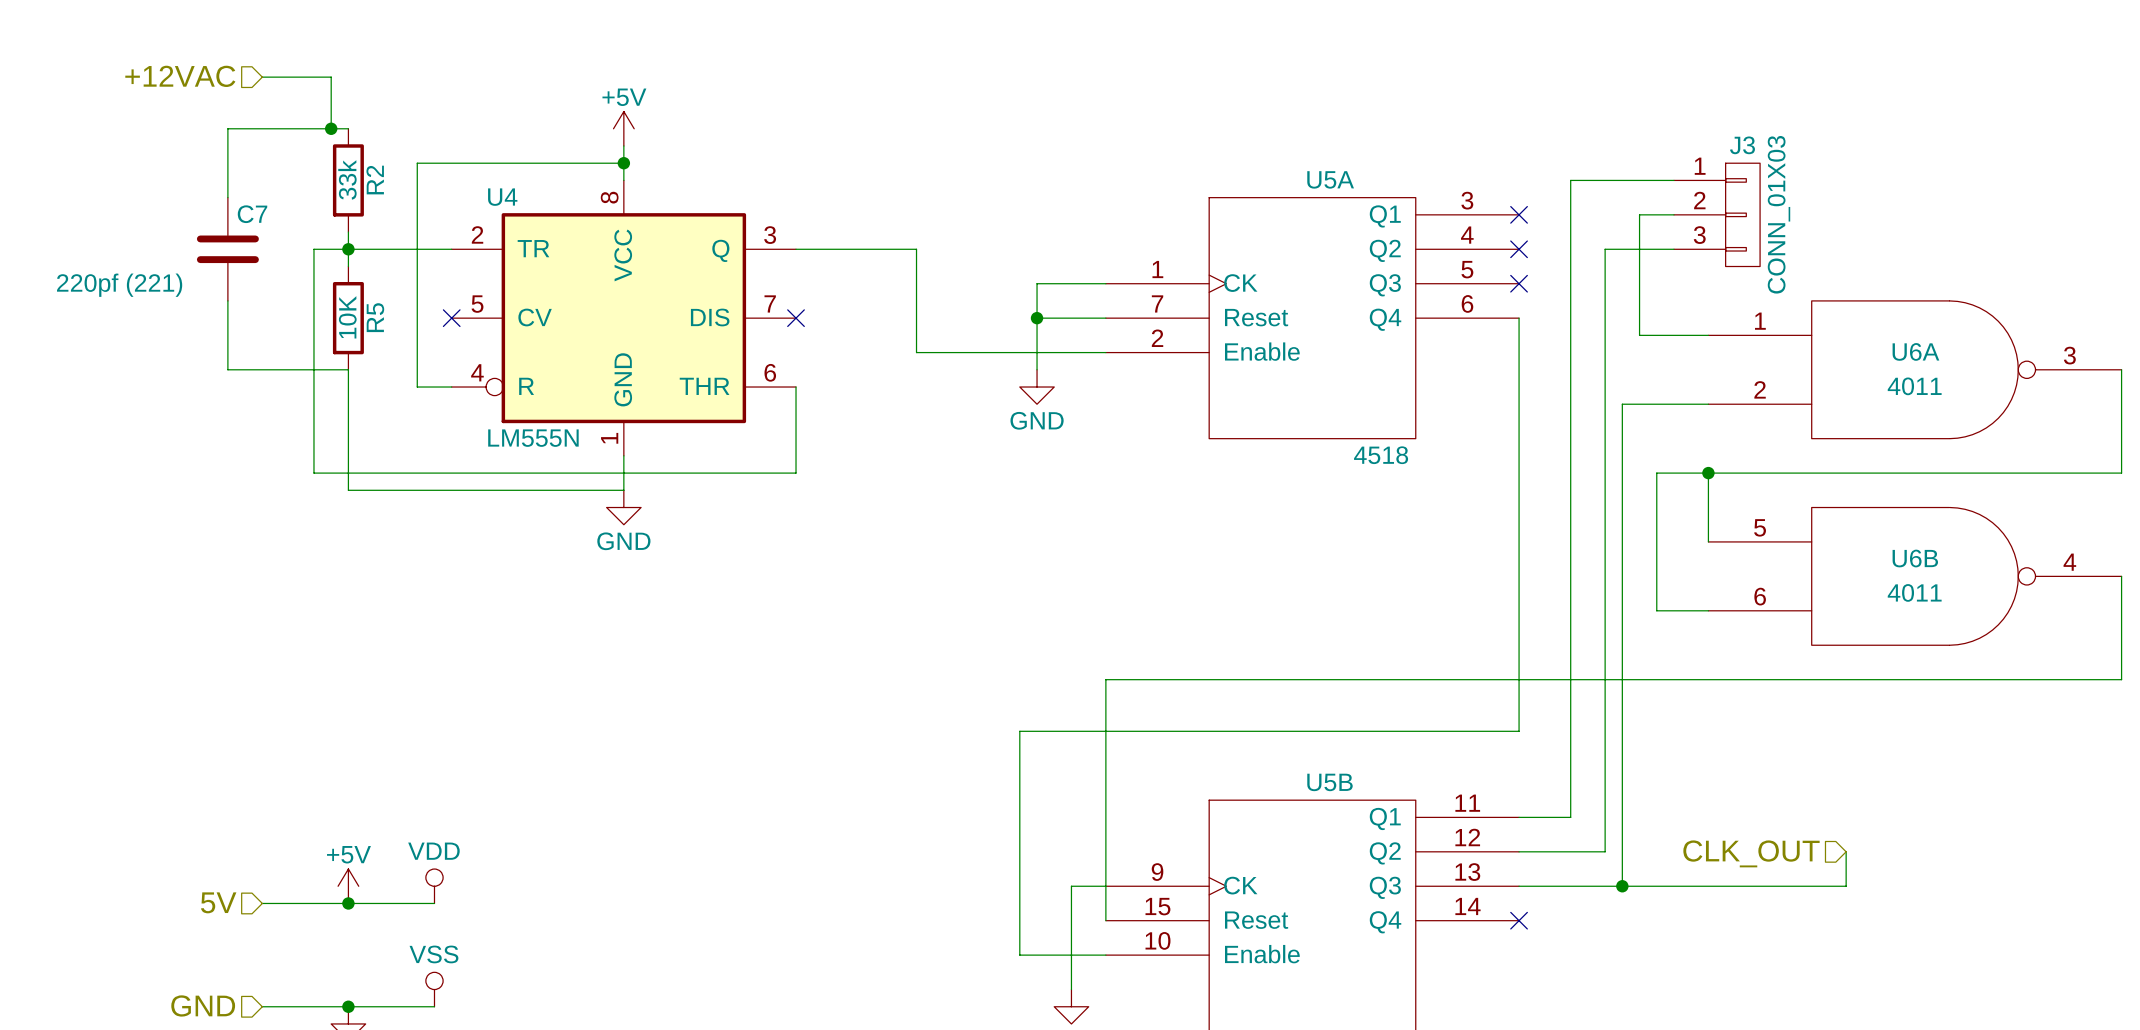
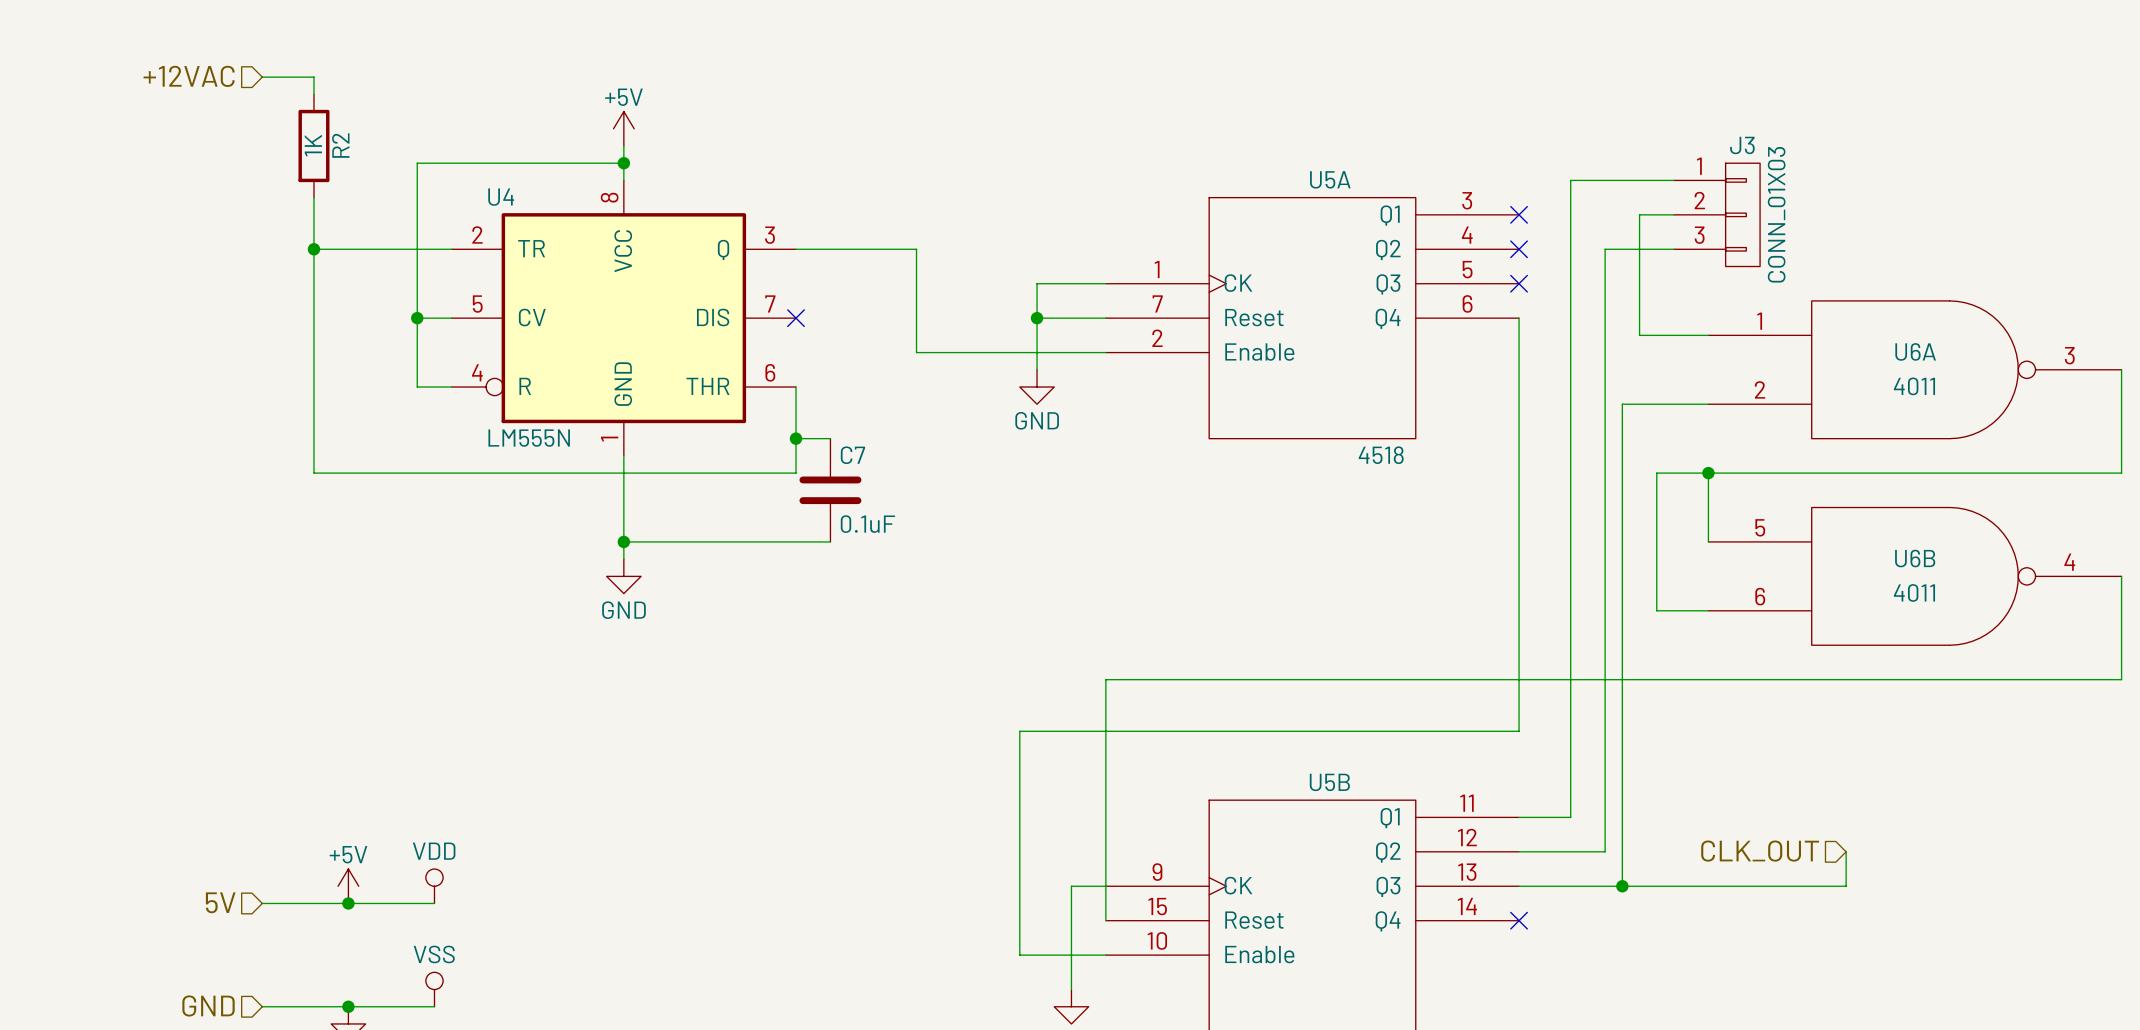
wire: (313, 77) (331, 77) (331, 128) -> (313, 77) (313, 94)
junction: (331, 128) -> none
wire: (348, 128) (227, 128) (227, 197) -> none
R2 value: 33k (347, 179) -> 1K (313, 145)
R2 position: (348, 180) -> (313, 145)
wire: none -> (313, 197) (313, 249)
wire: (348, 232) (348, 266) -> none
C7 position: (227, 249) -> (830, 490)
junction position: (348, 249) -> (313, 249)
C7 value: 220pf (221) (119, 285) -> 0.1uF (867, 524)
wire: (227, 300) (227, 369) (348, 369) (348, 490) (623, 490) -> (623, 559) (623, 490)
R5: 10K (348, 318) -> none
wire: none -> (417, 318) (451, 318)
junction: none -> (417, 318)
no-connect mark: (451, 318) -> none
wire: none -> (796, 438) (830, 438)
junction: none -> (796, 438)
power symbol position: GND (623, 507) -> GND (623, 576)
wire: none -> (623, 541) (830, 541)
junction: none -> (623, 541)

